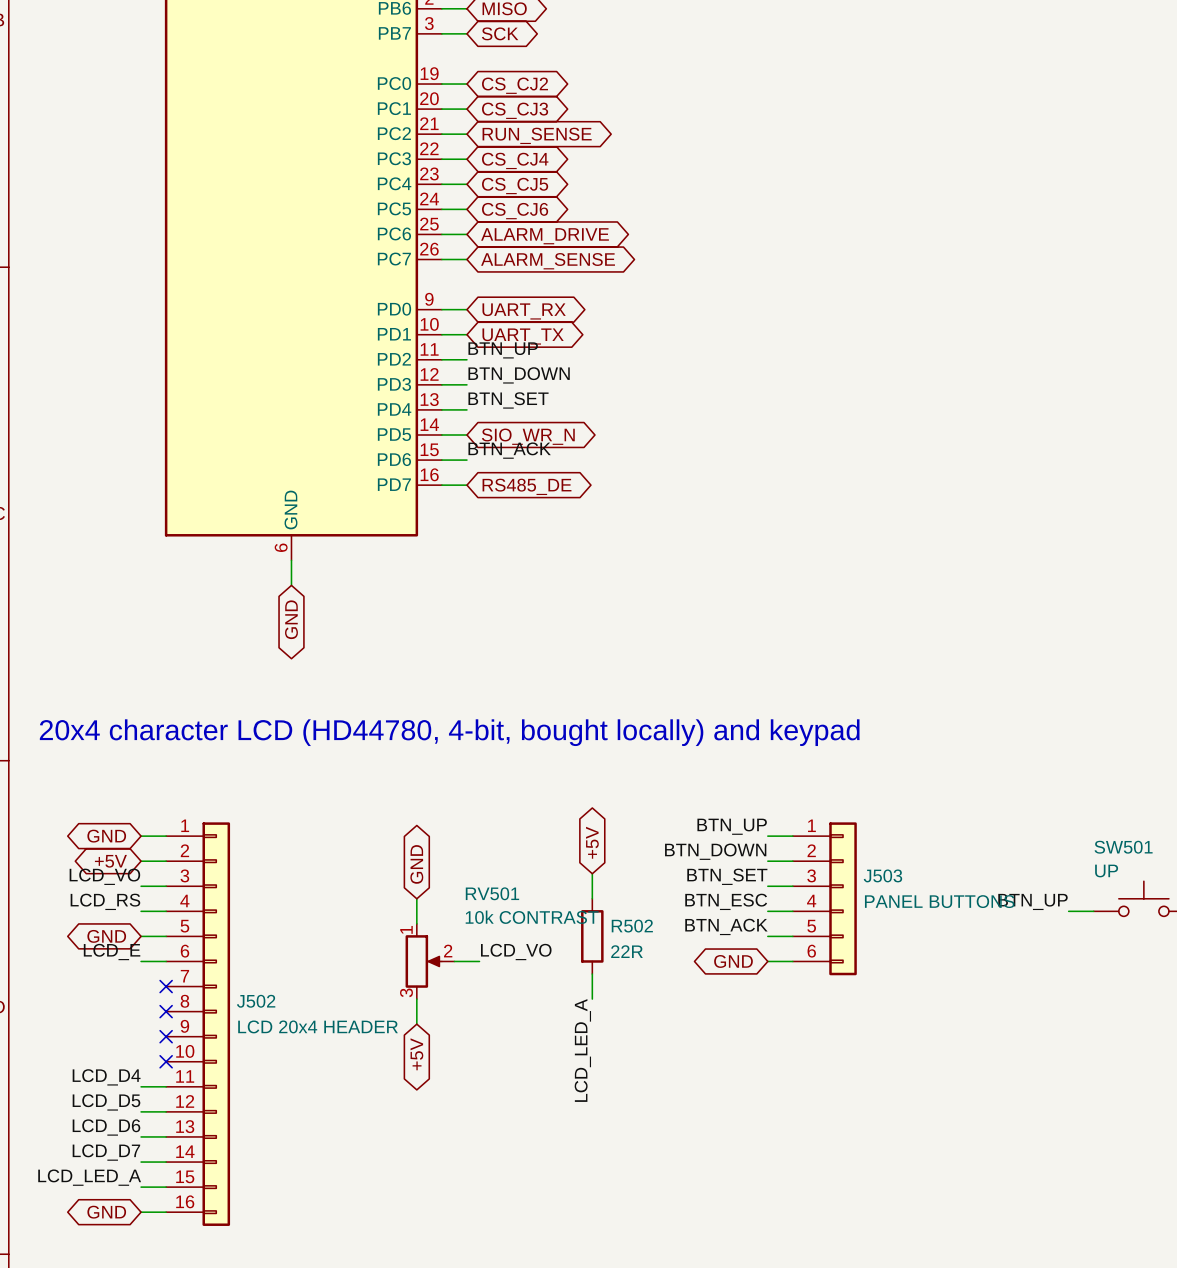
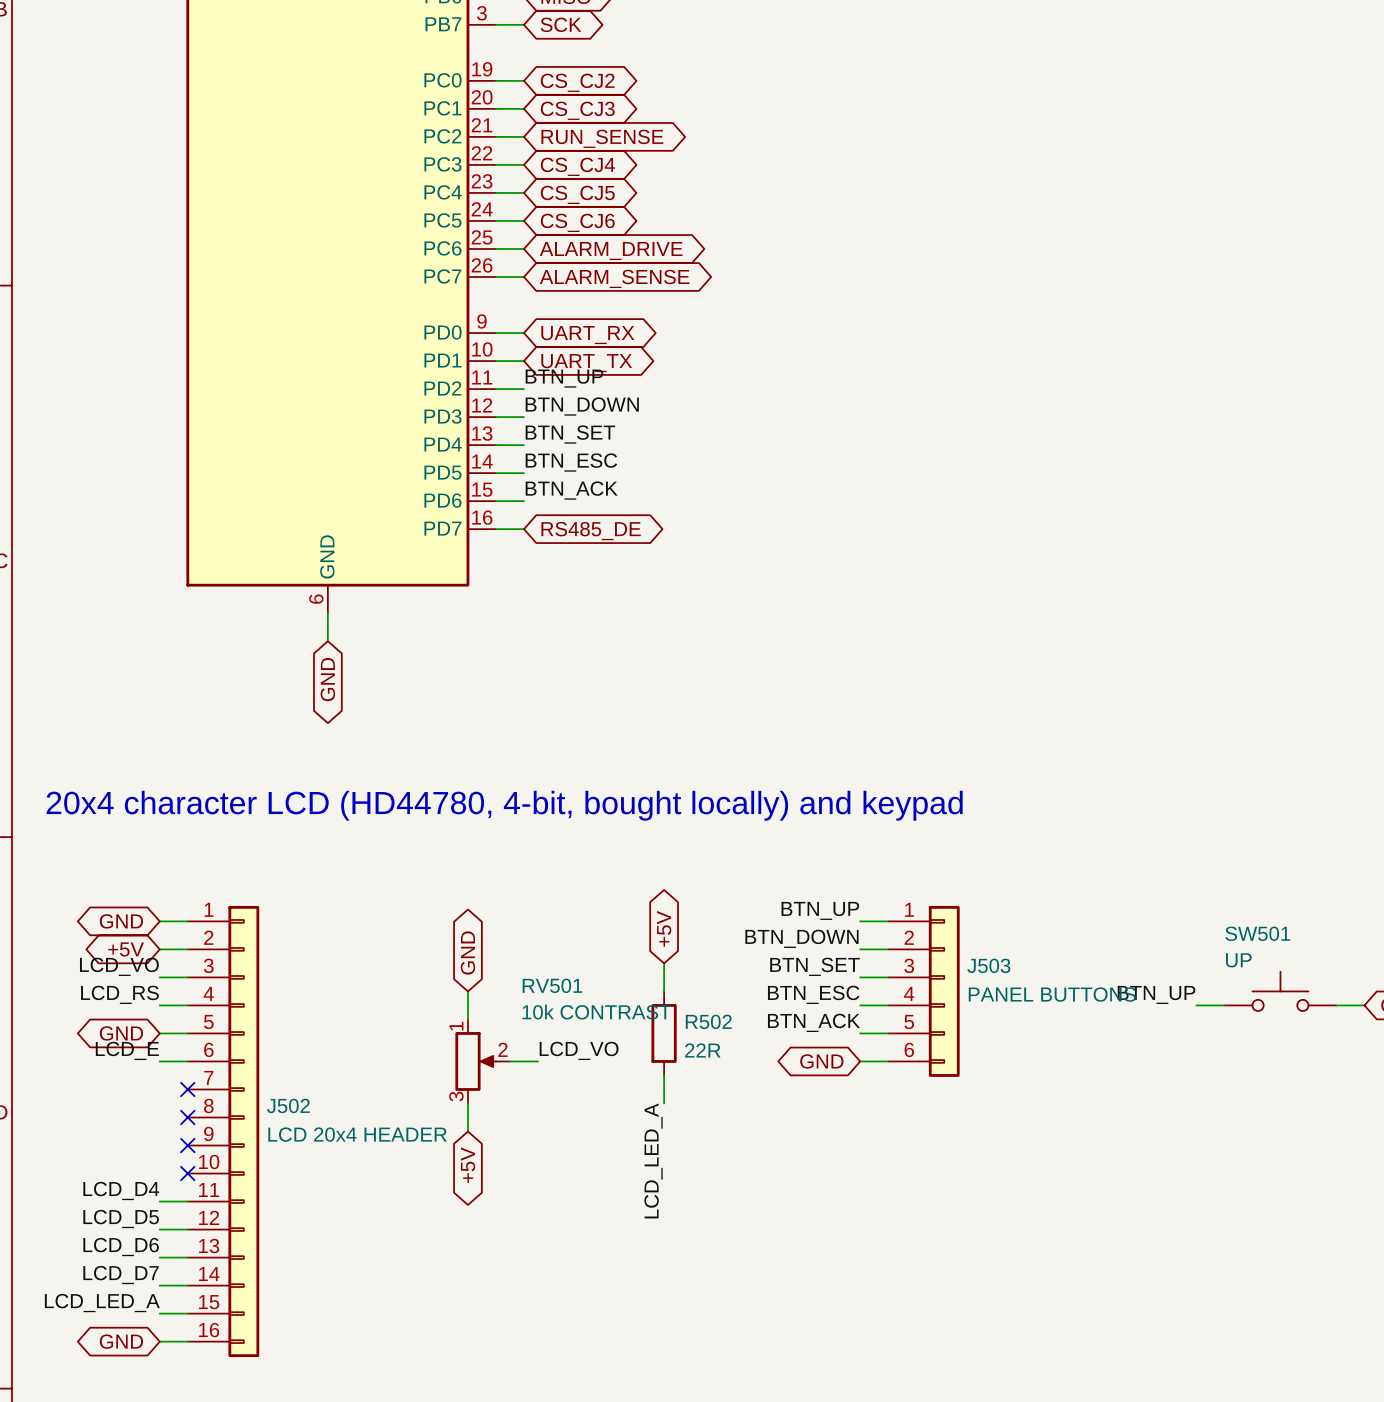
label: none -> BTN_ESC (571, 462)
global label: SIO_WR_N (528, 436) -> none

